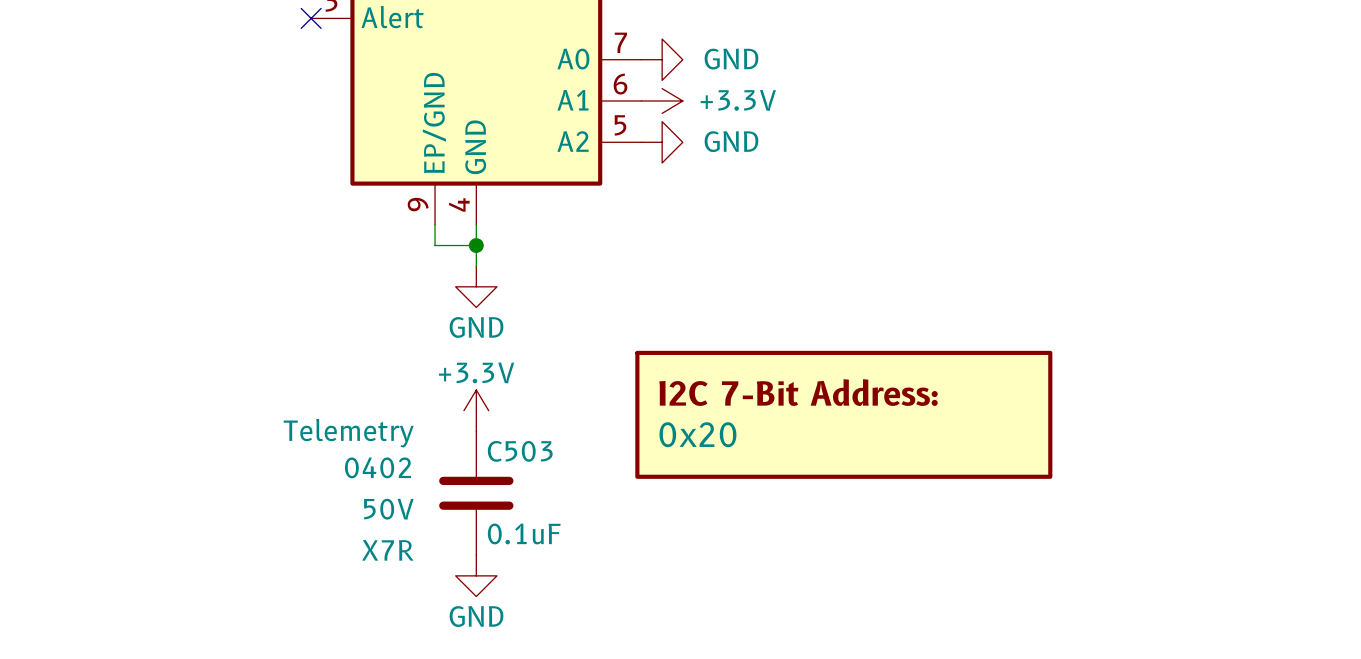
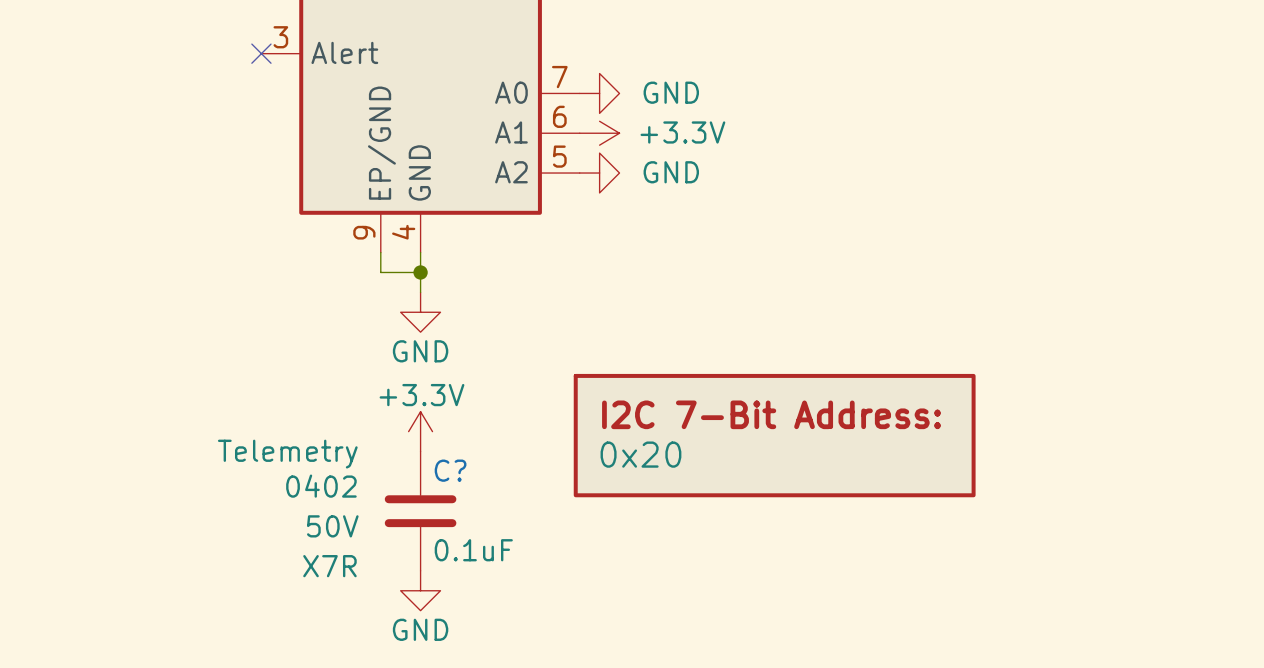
C503 name: C503 (520, 451) -> C? (450, 470)

